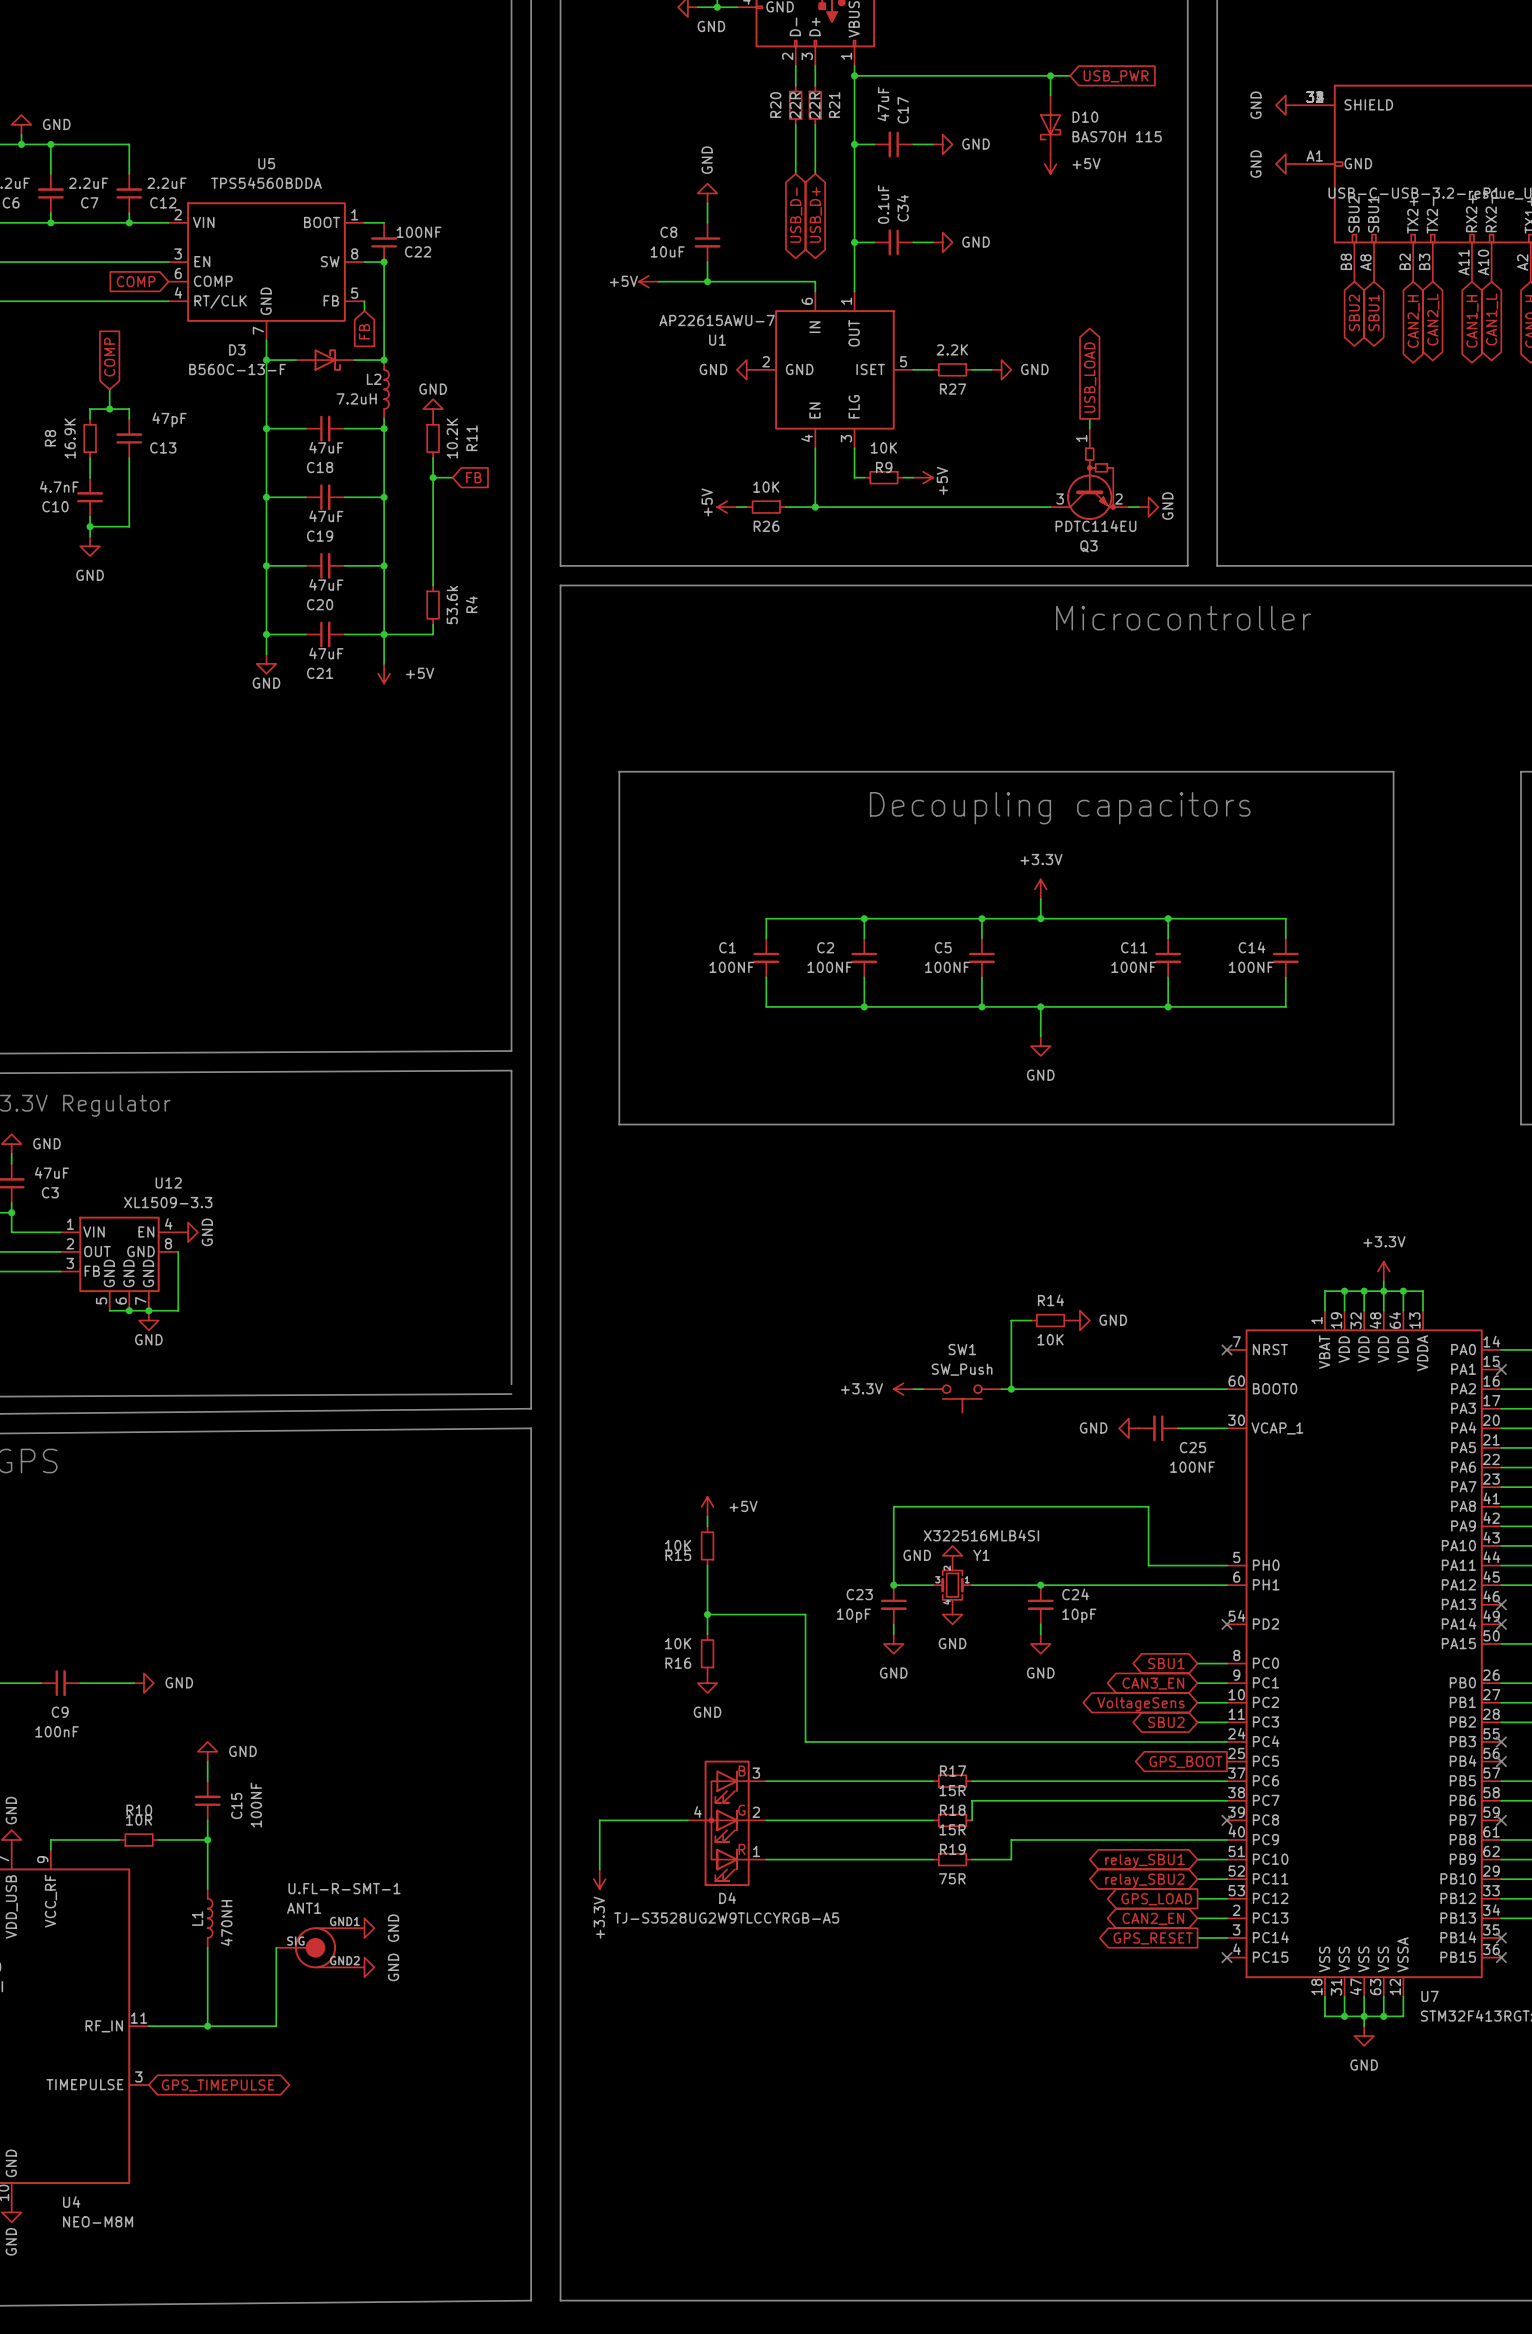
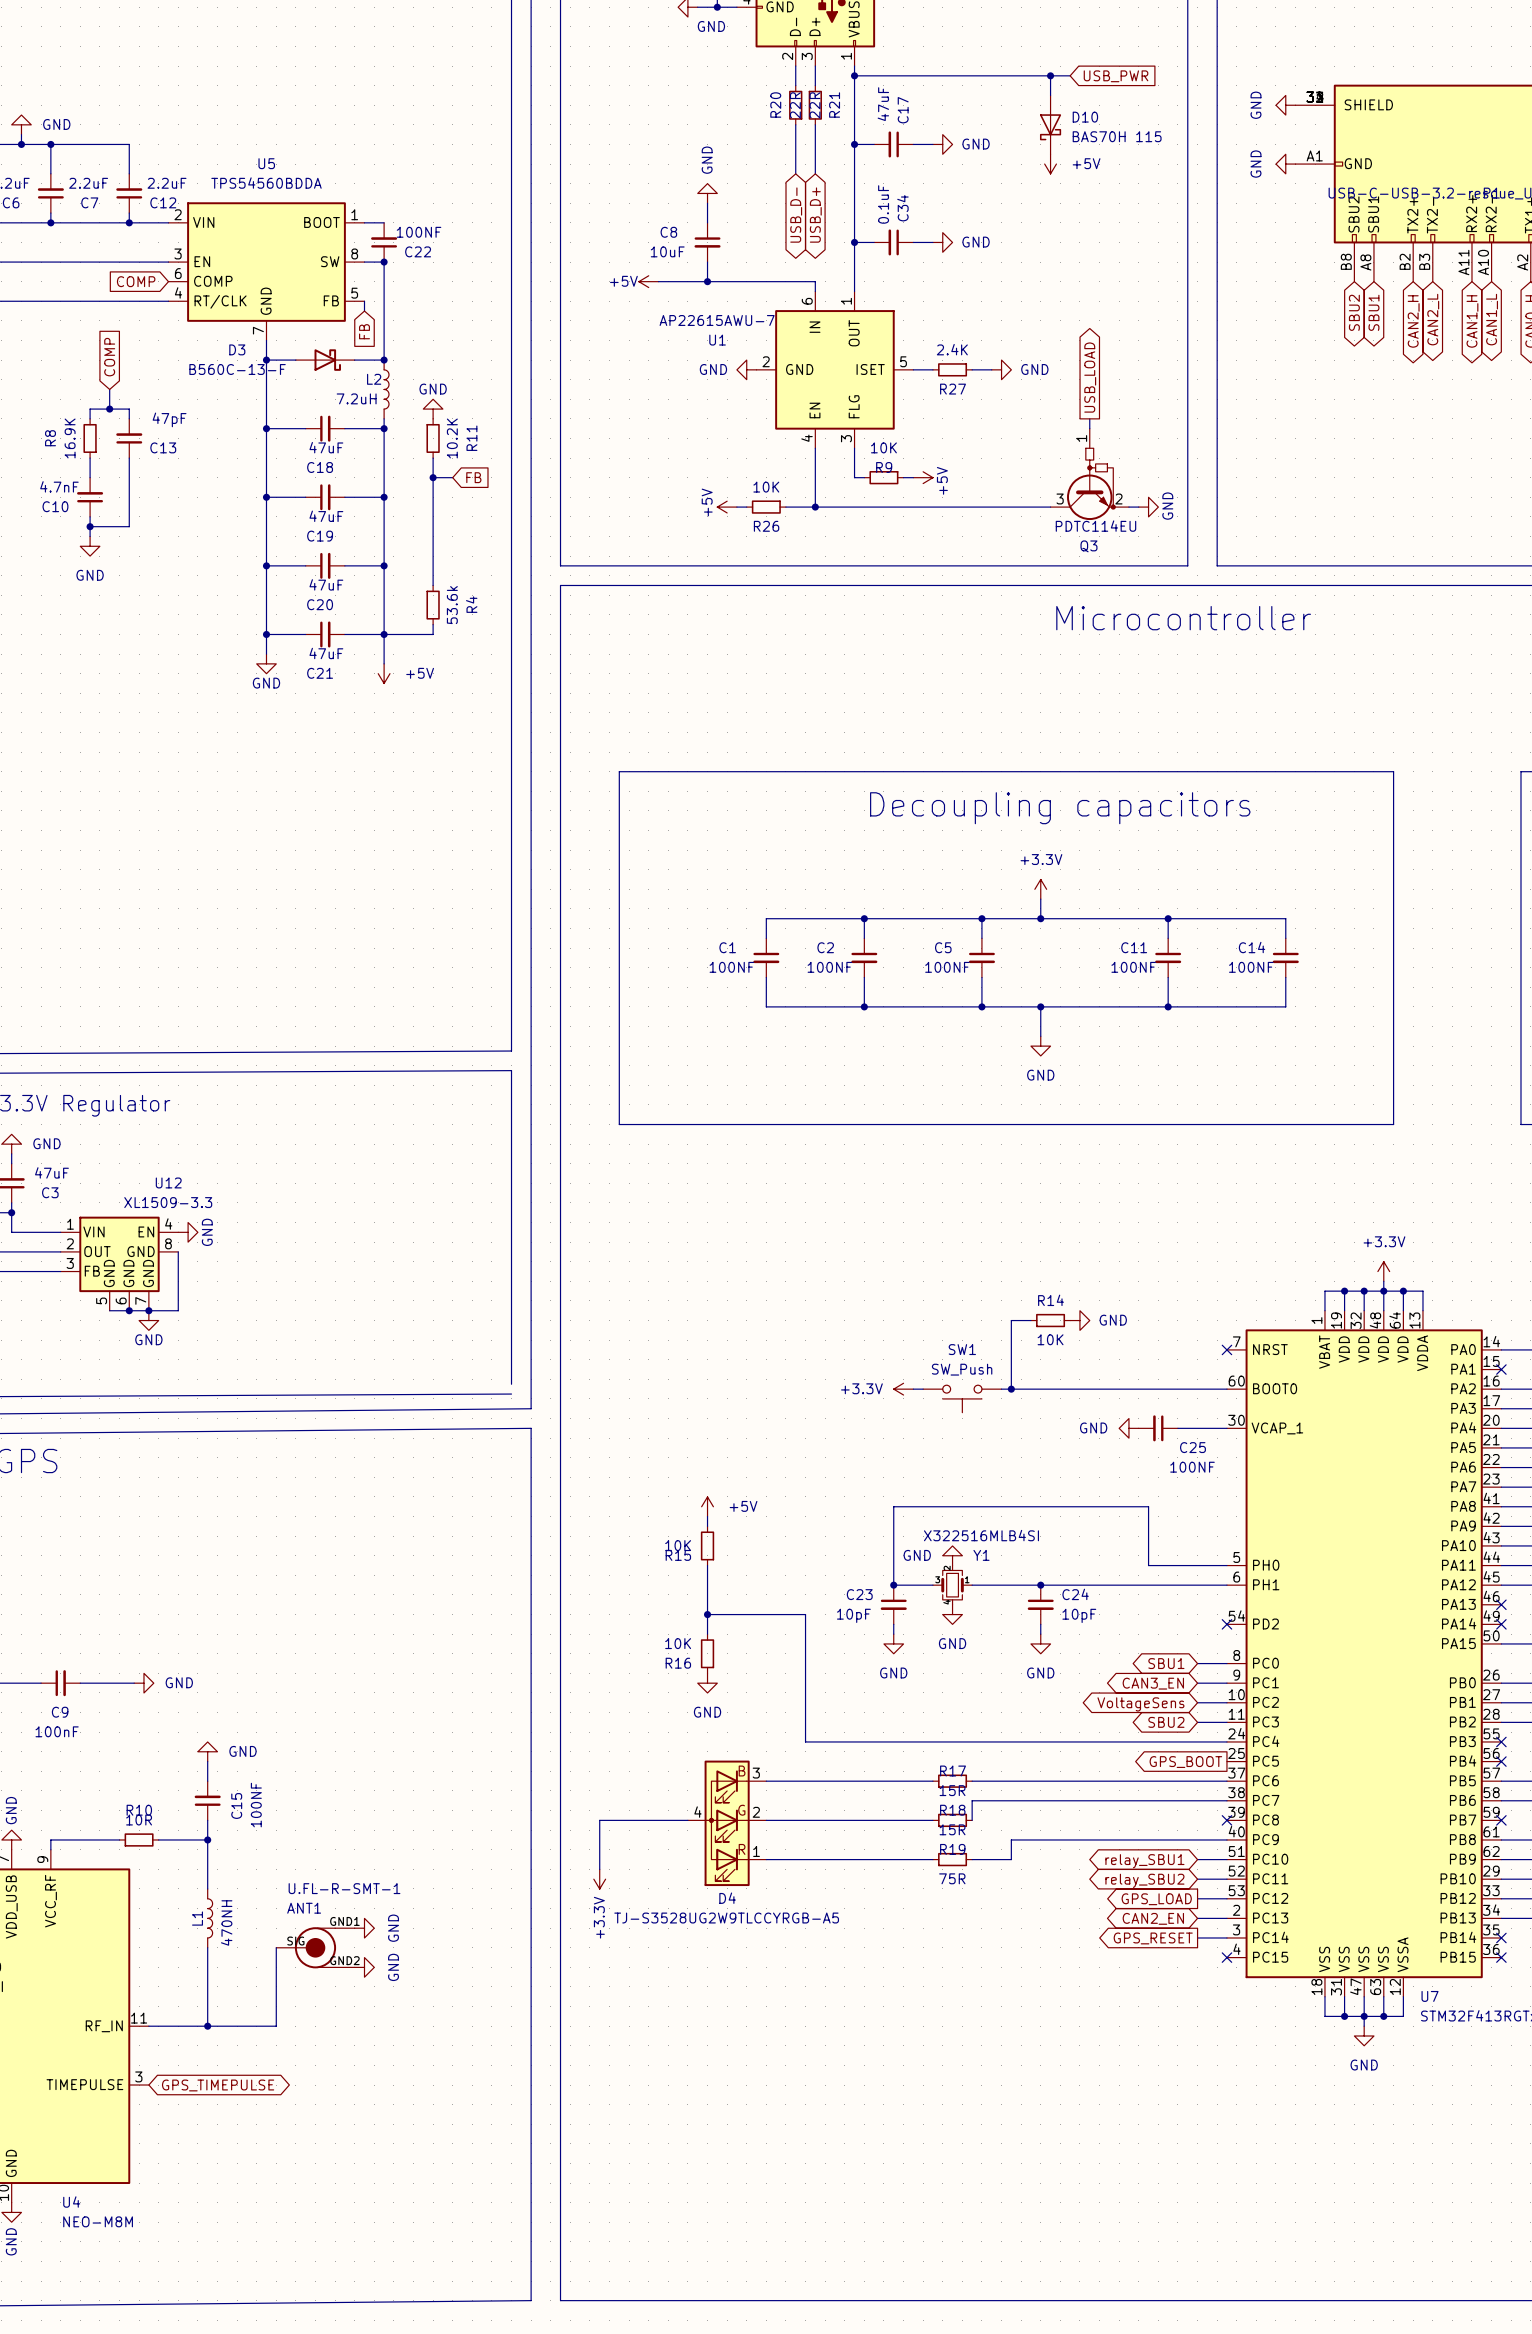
R27 value: 2.2K (952, 349) -> 2.4K (952, 349)

